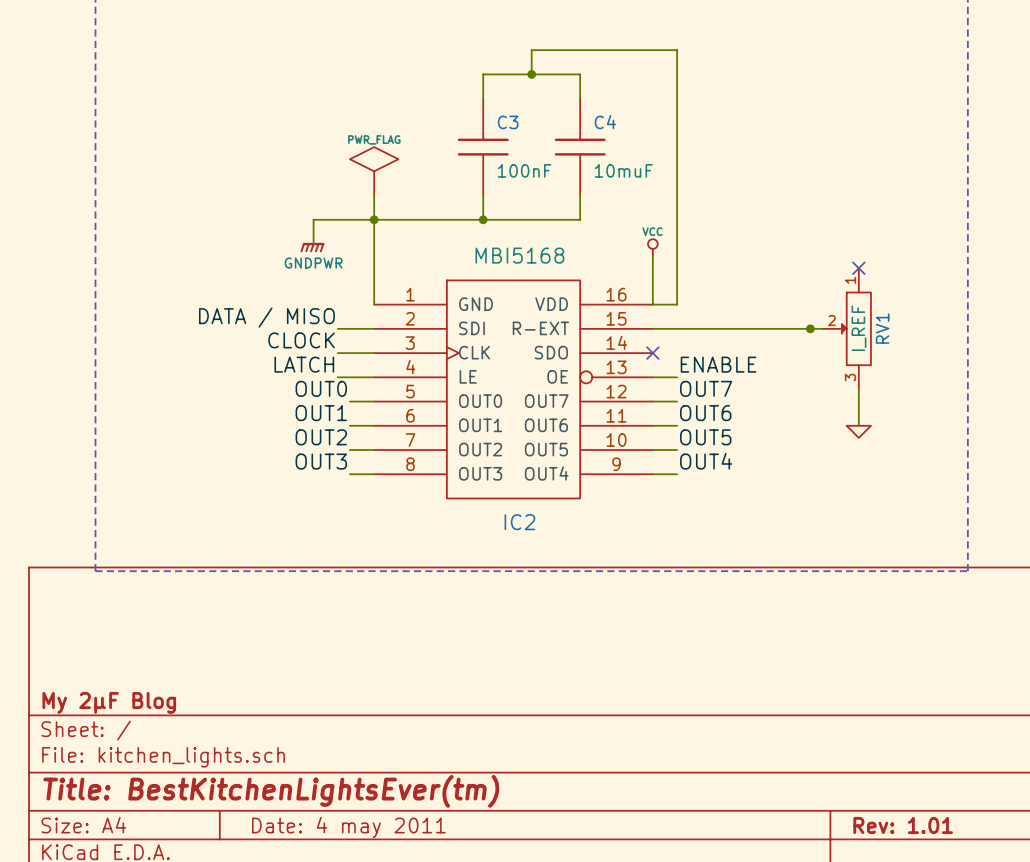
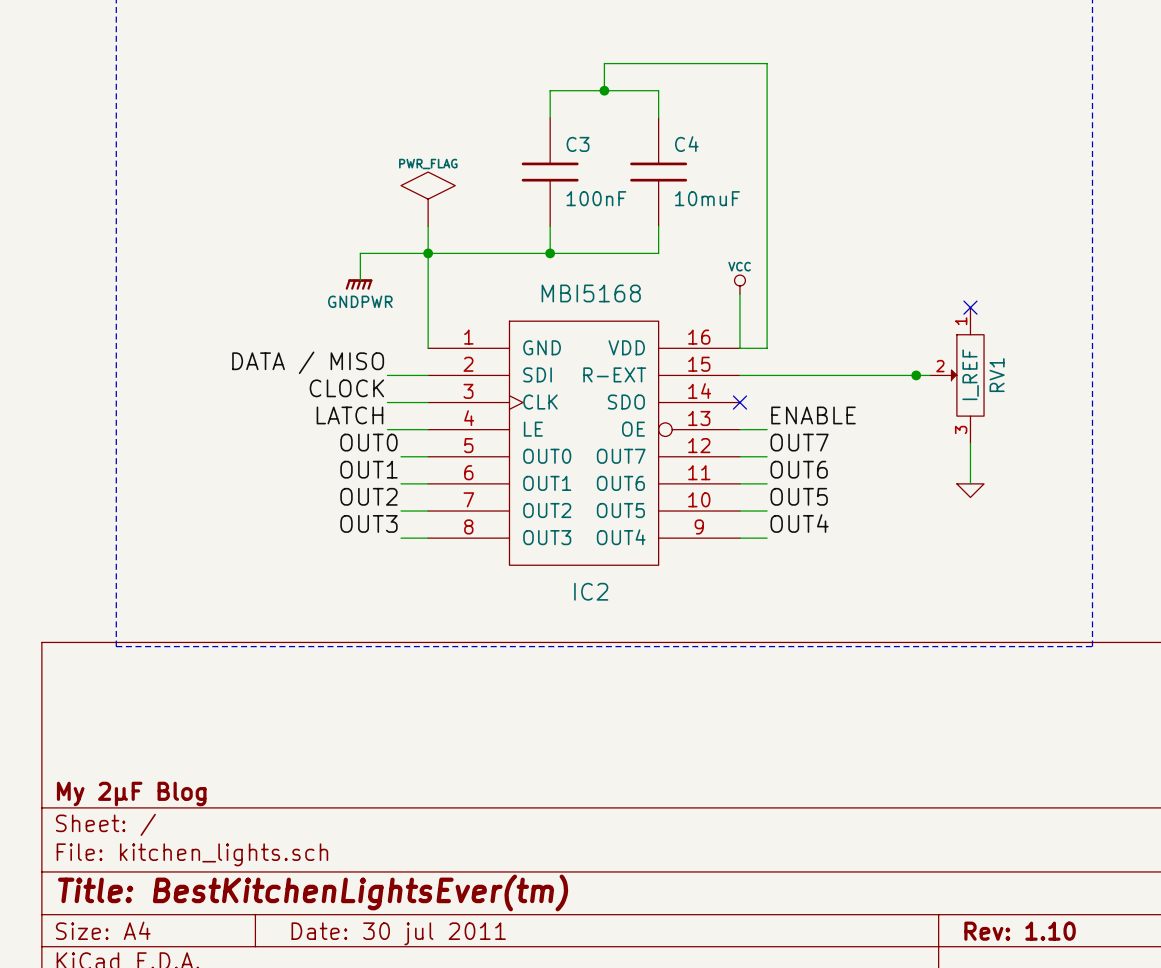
title block: Rev: 1.01 (903, 825) -> Rev: 1.10 (1020, 931)
title block: Date: 4 may 2011 (348, 827) -> Date: 30 jul 2011 (398, 933)

